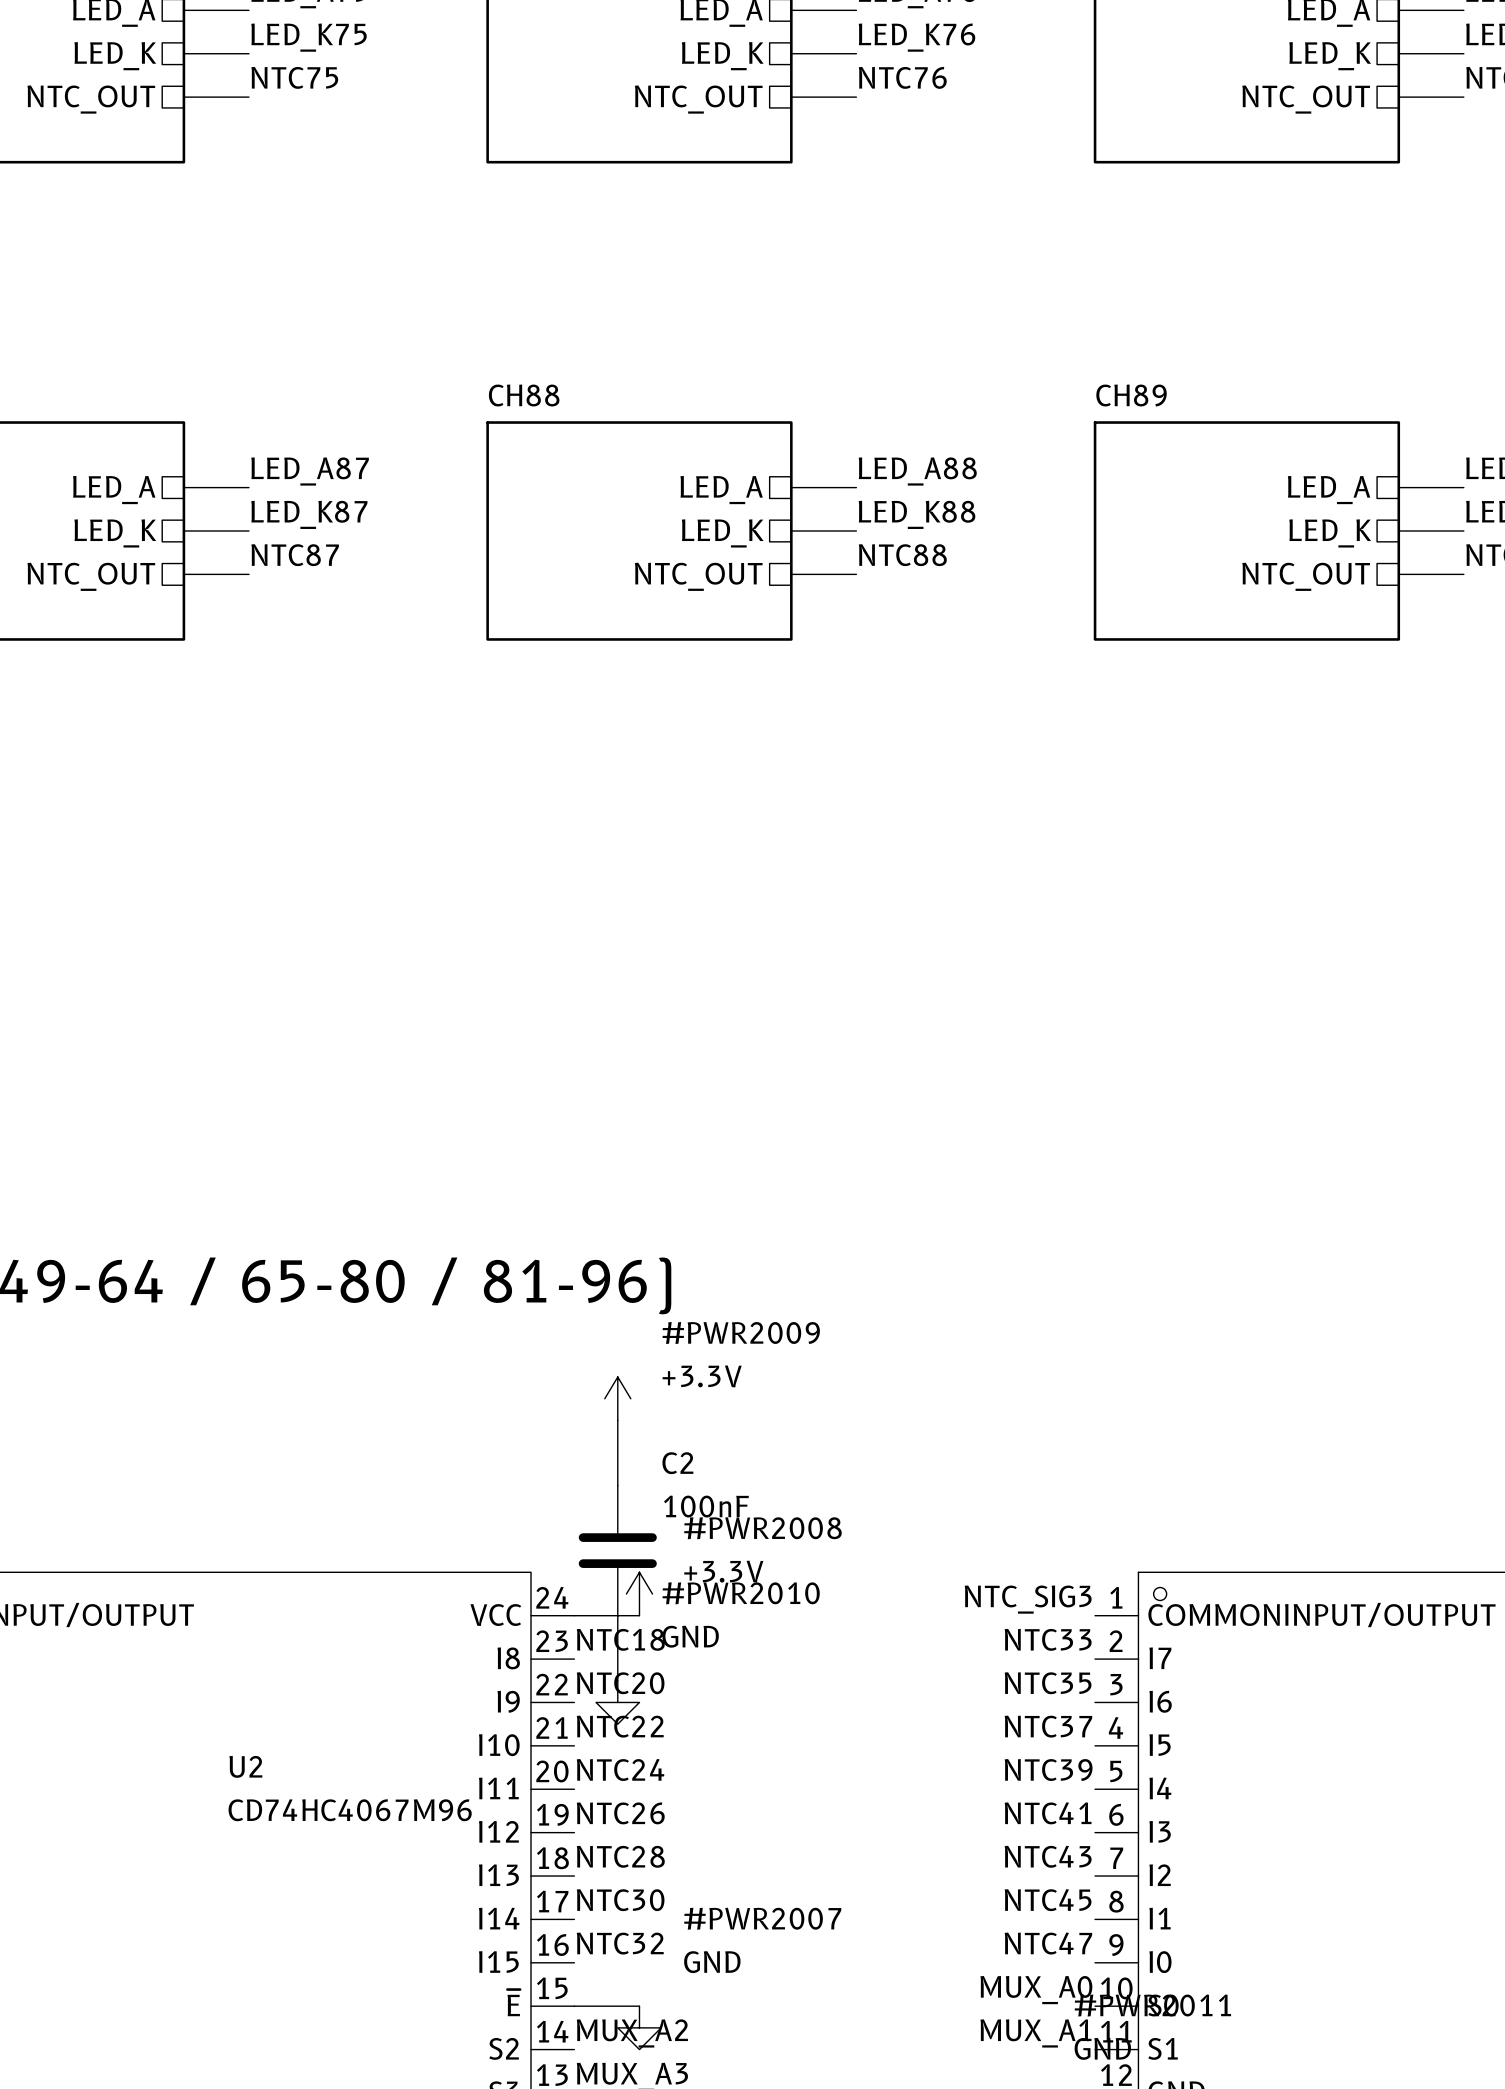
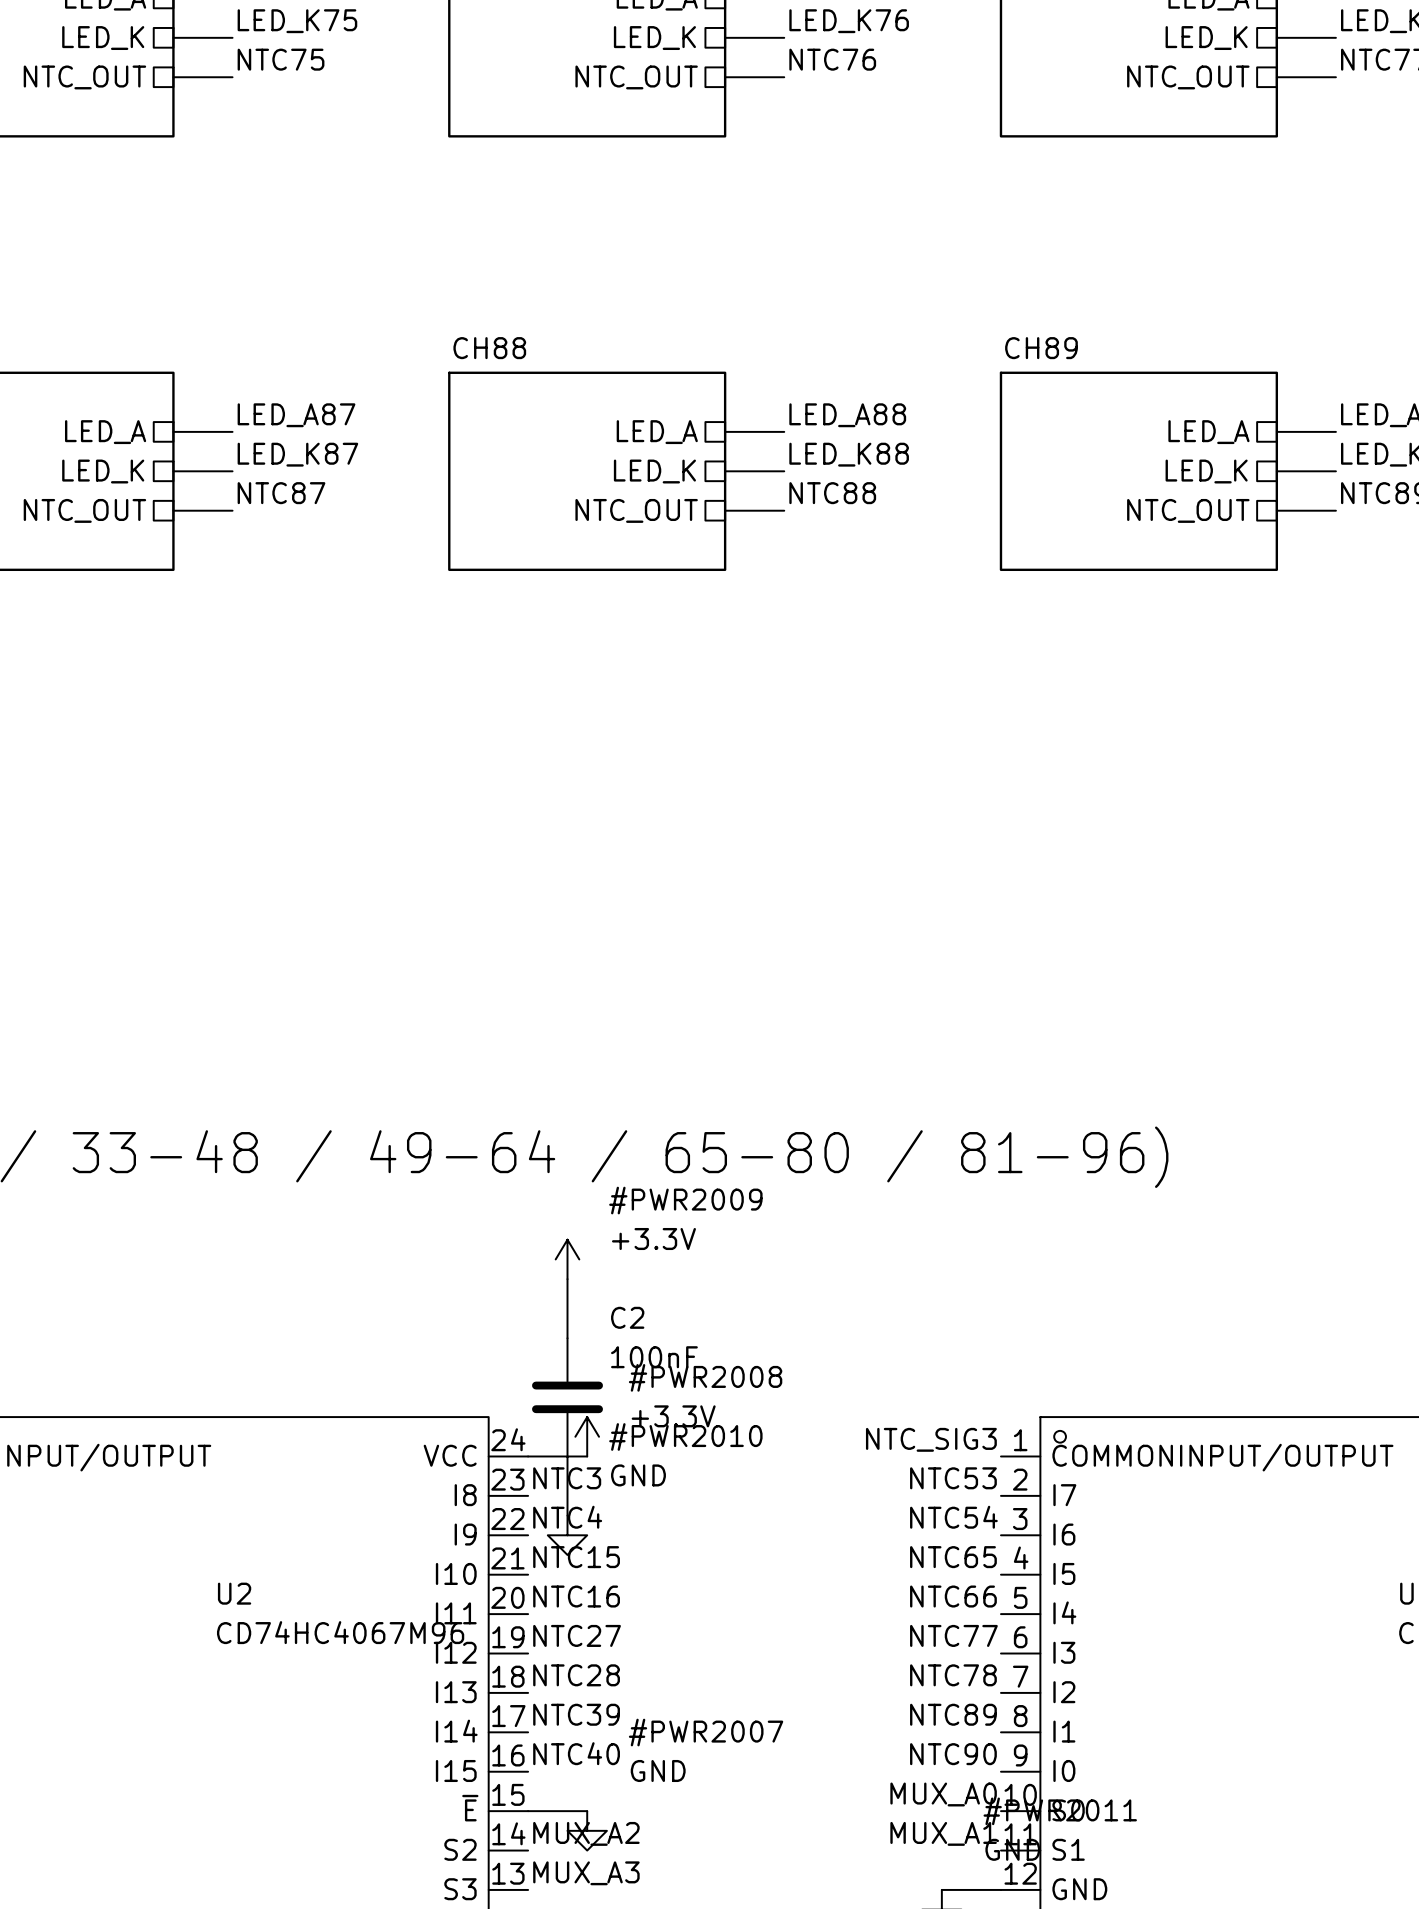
label: NTC18 (620, 1639) -> NTC3 (567, 1478)
label: NTC33 (1048, 1639) -> NTC53 (953, 1478)
label: NTC20 (620, 1683) -> NTC4 (567, 1517)
label: NTC35 (1048, 1683) -> NTC54 (953, 1517)
label: NTC22 (620, 1726) -> NTC15 (576, 1557)
label: NTC37 (1048, 1726) -> NTC65 (953, 1557)
label: NTC24 (620, 1770) -> NTC16 (576, 1596)
label: NTC39 (1048, 1770) -> NTC66 (953, 1596)
label: NTC26 (620, 1813) -> NTC27 (577, 1635)
label: NTC41 (1048, 1813) -> NTC77 (953, 1635)
label: NTC43 (1048, 1856) -> NTC78 (953, 1675)
label: NTC30 (620, 1900) -> NTC39 (576, 1714)
label: NTC45 (1048, 1900) -> NTC89 (953, 1714)
label: NTC32 (620, 1943) -> NTC40 (576, 1753)
label: NTC47 (1048, 1943) -> NTC90 (953, 1754)

